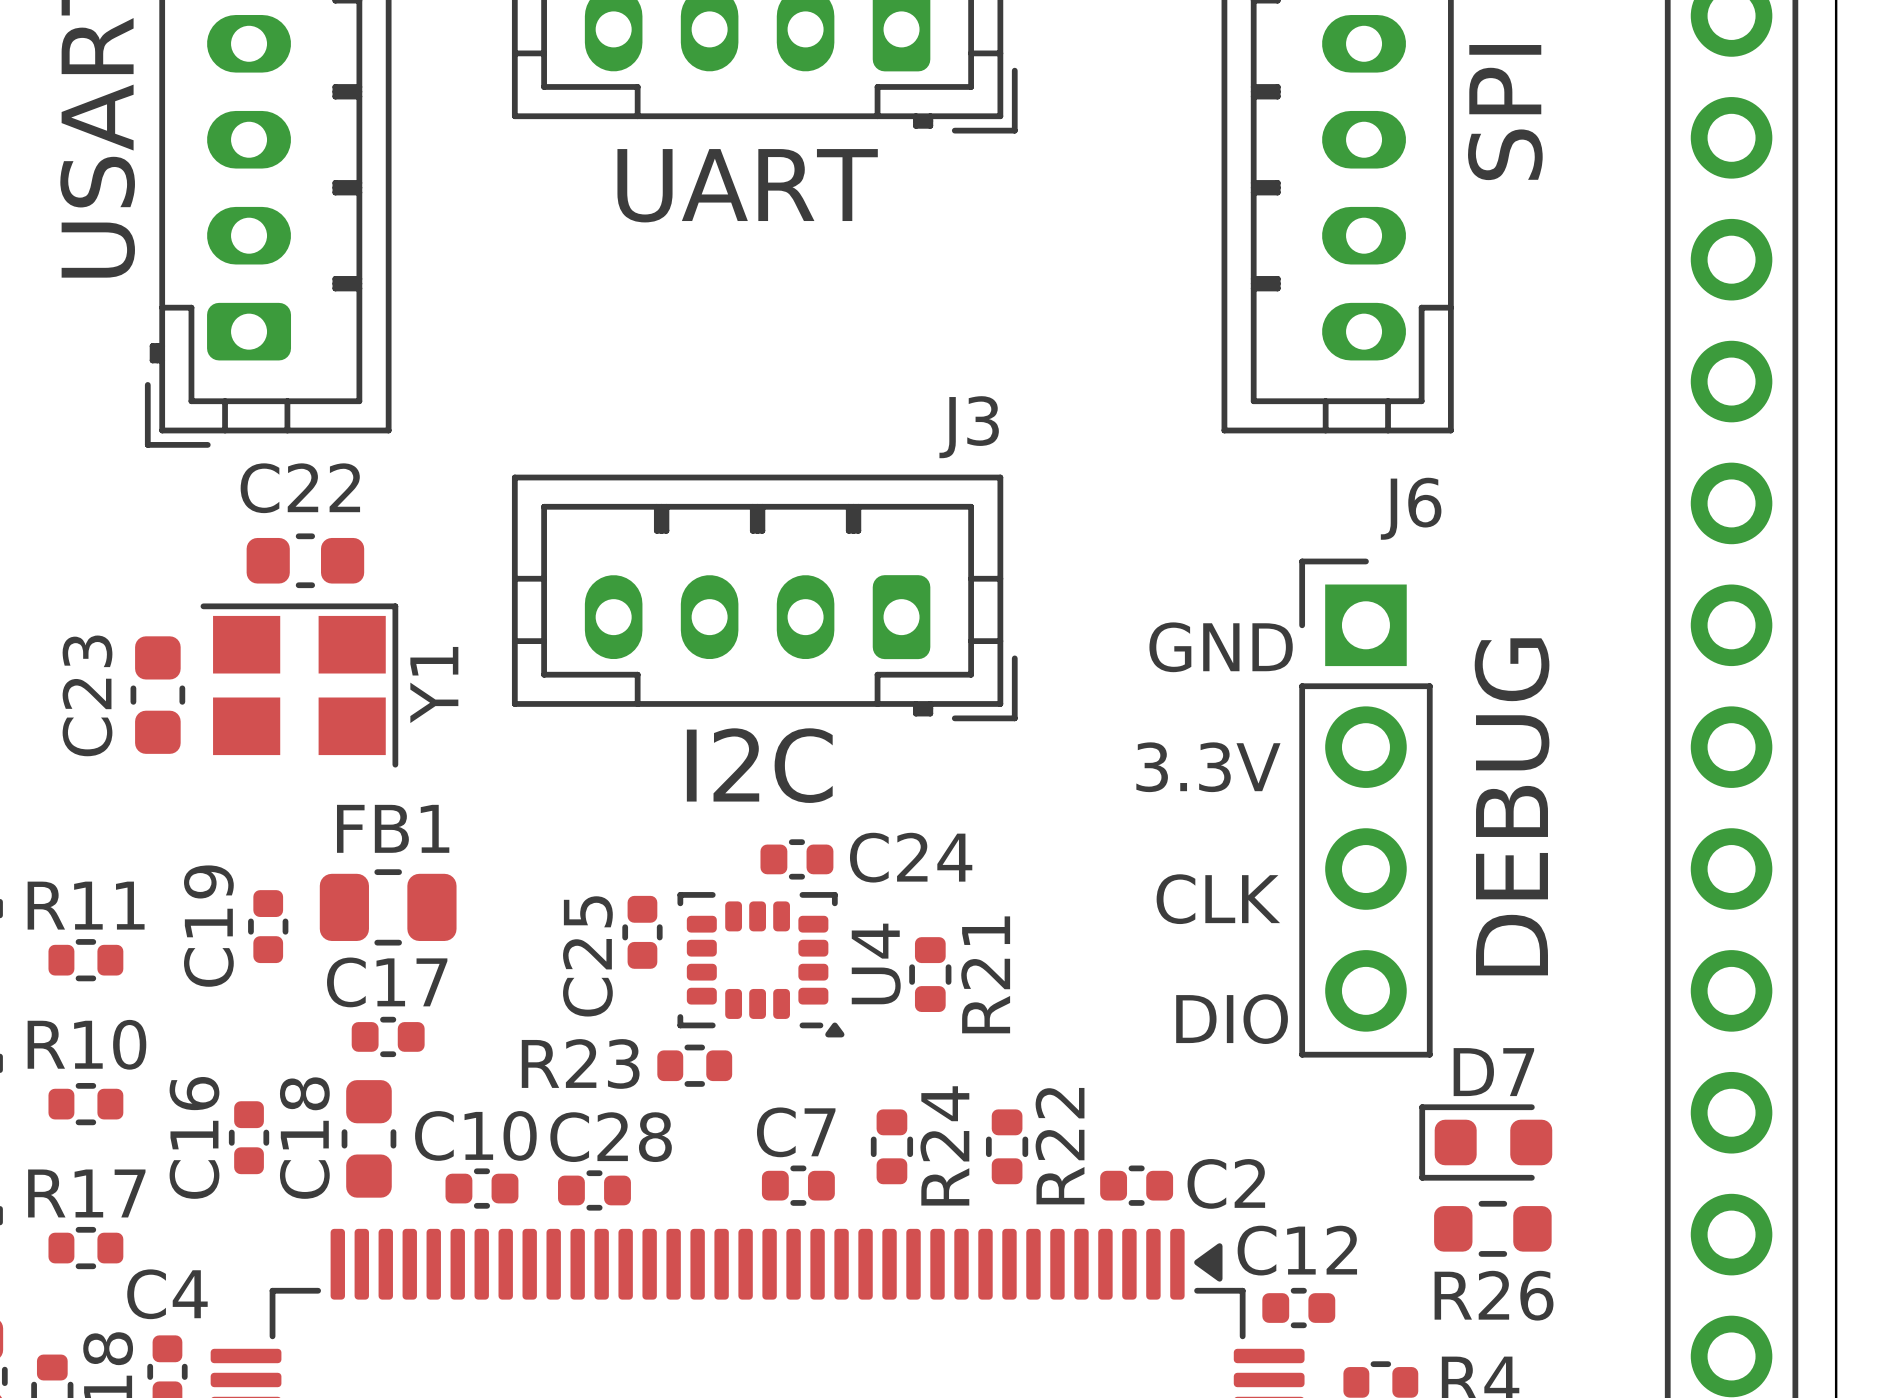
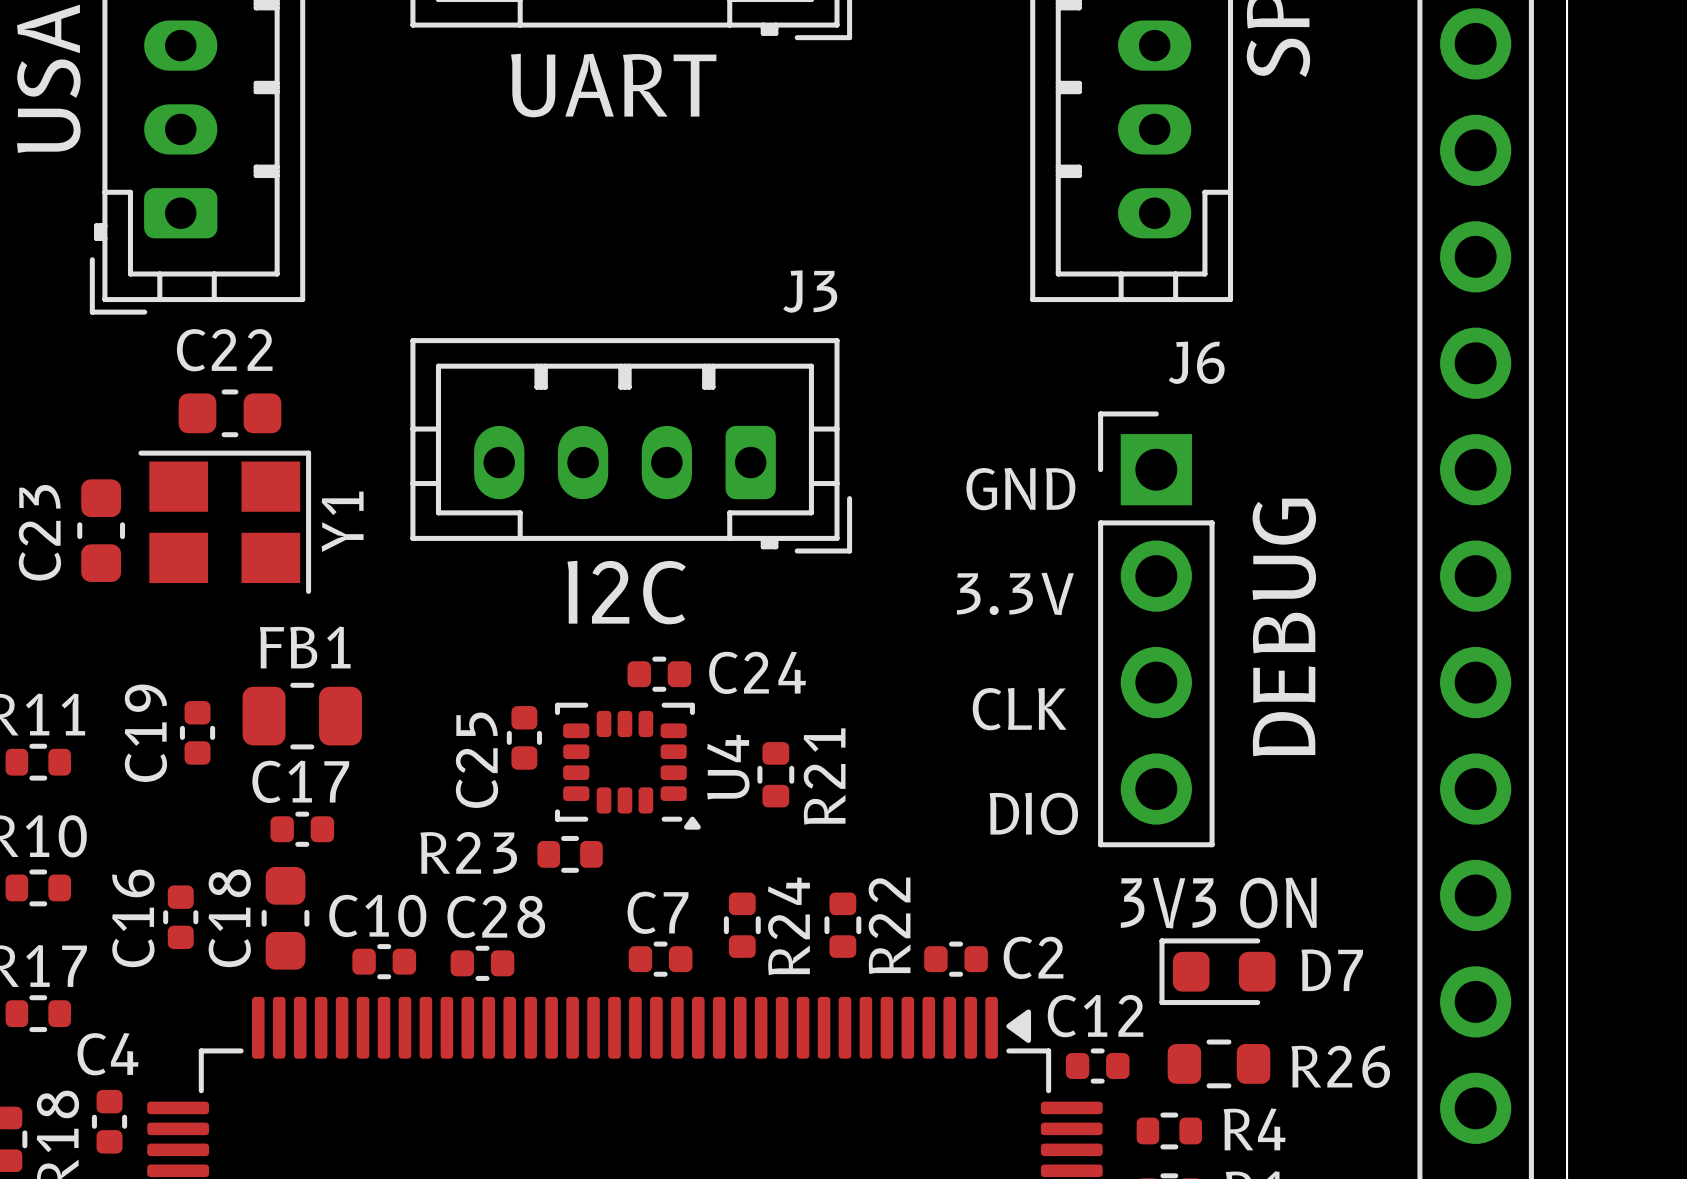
D7 name position: D7 (1493, 1072) -> D7 (1332, 970)
text: none -> 3V3 (1168, 903)
text: none -> ON (1278, 902)
D7 position: (1485, 1142) -> (1217, 971)
R26 position: (1492, 1228) -> (1218, 1063)
R26 name position: R26 (1494, 1295) -> R26 (1340, 1066)

